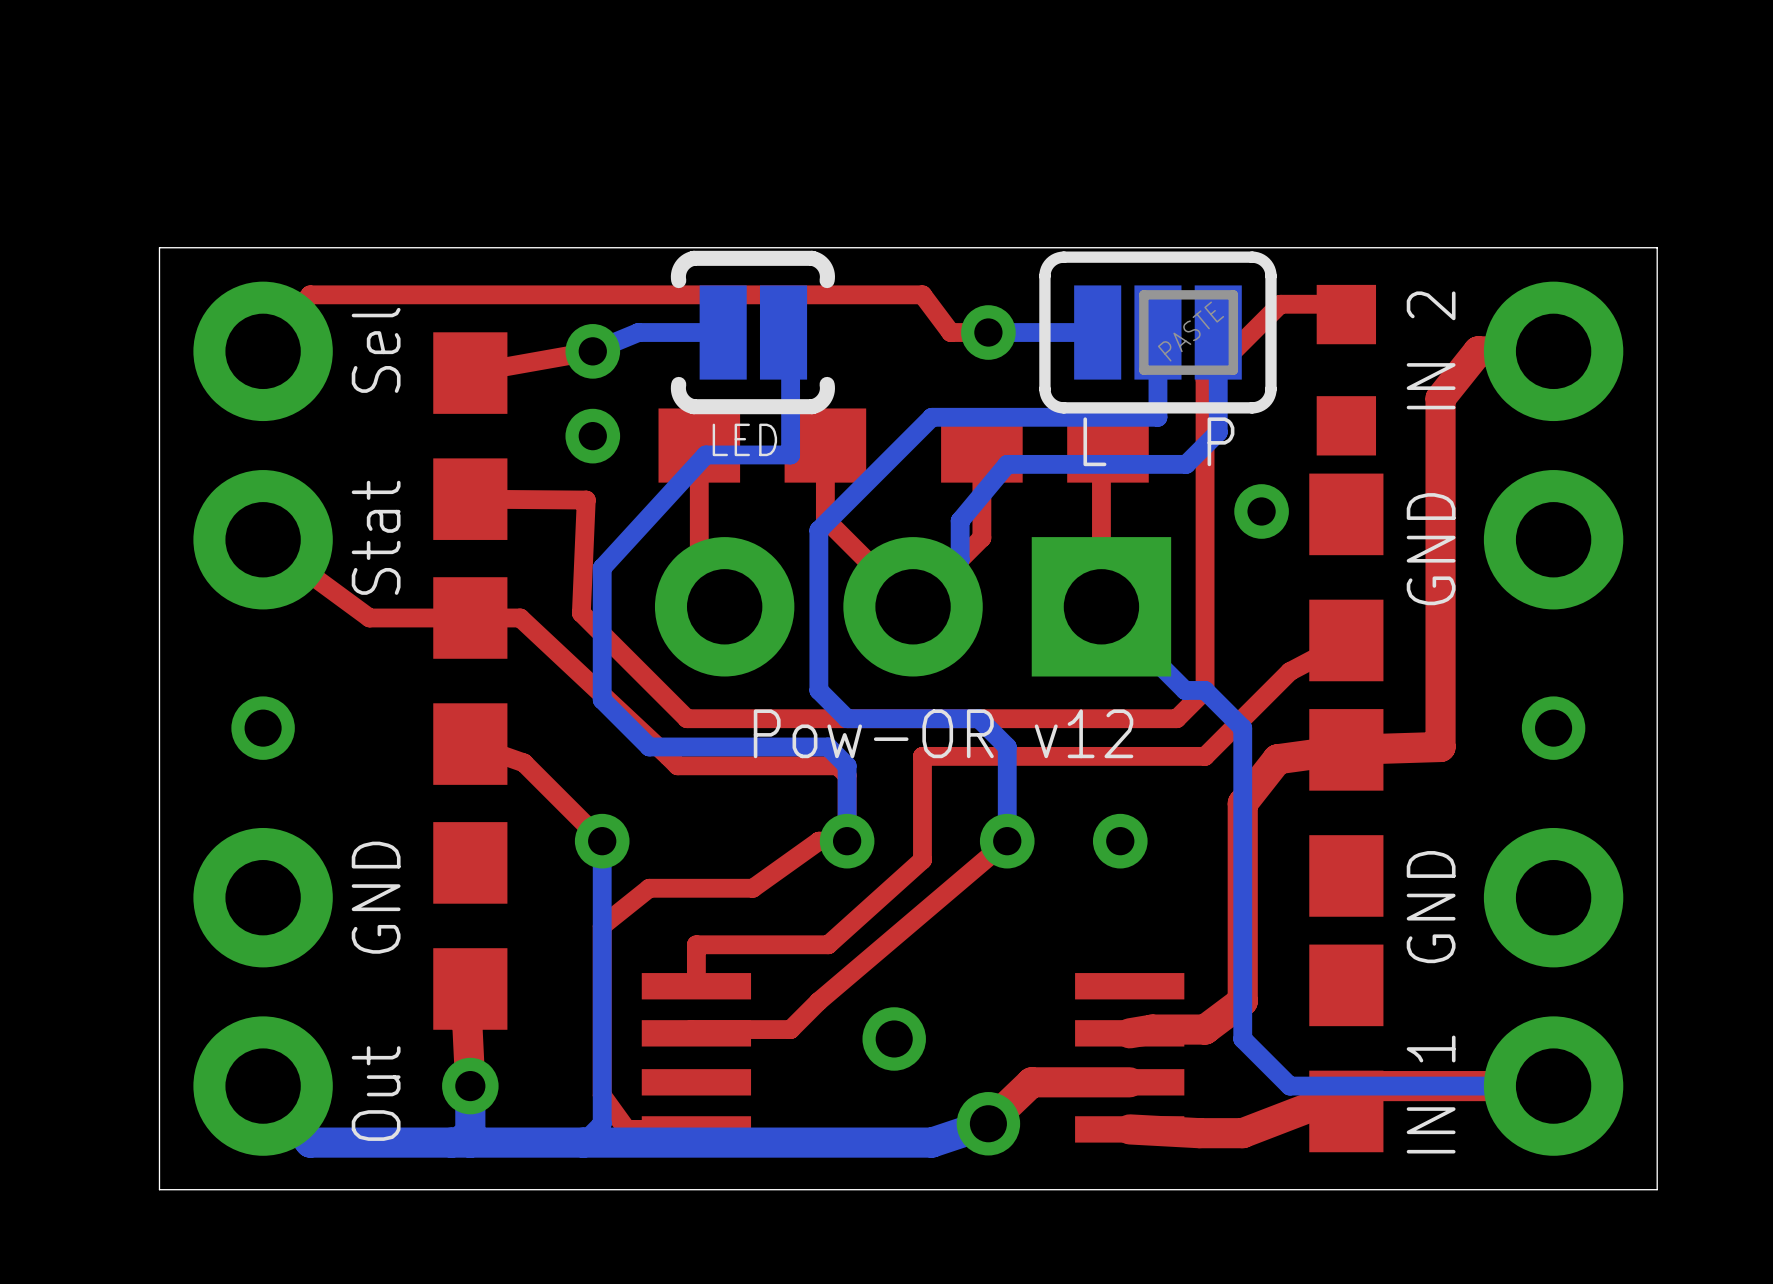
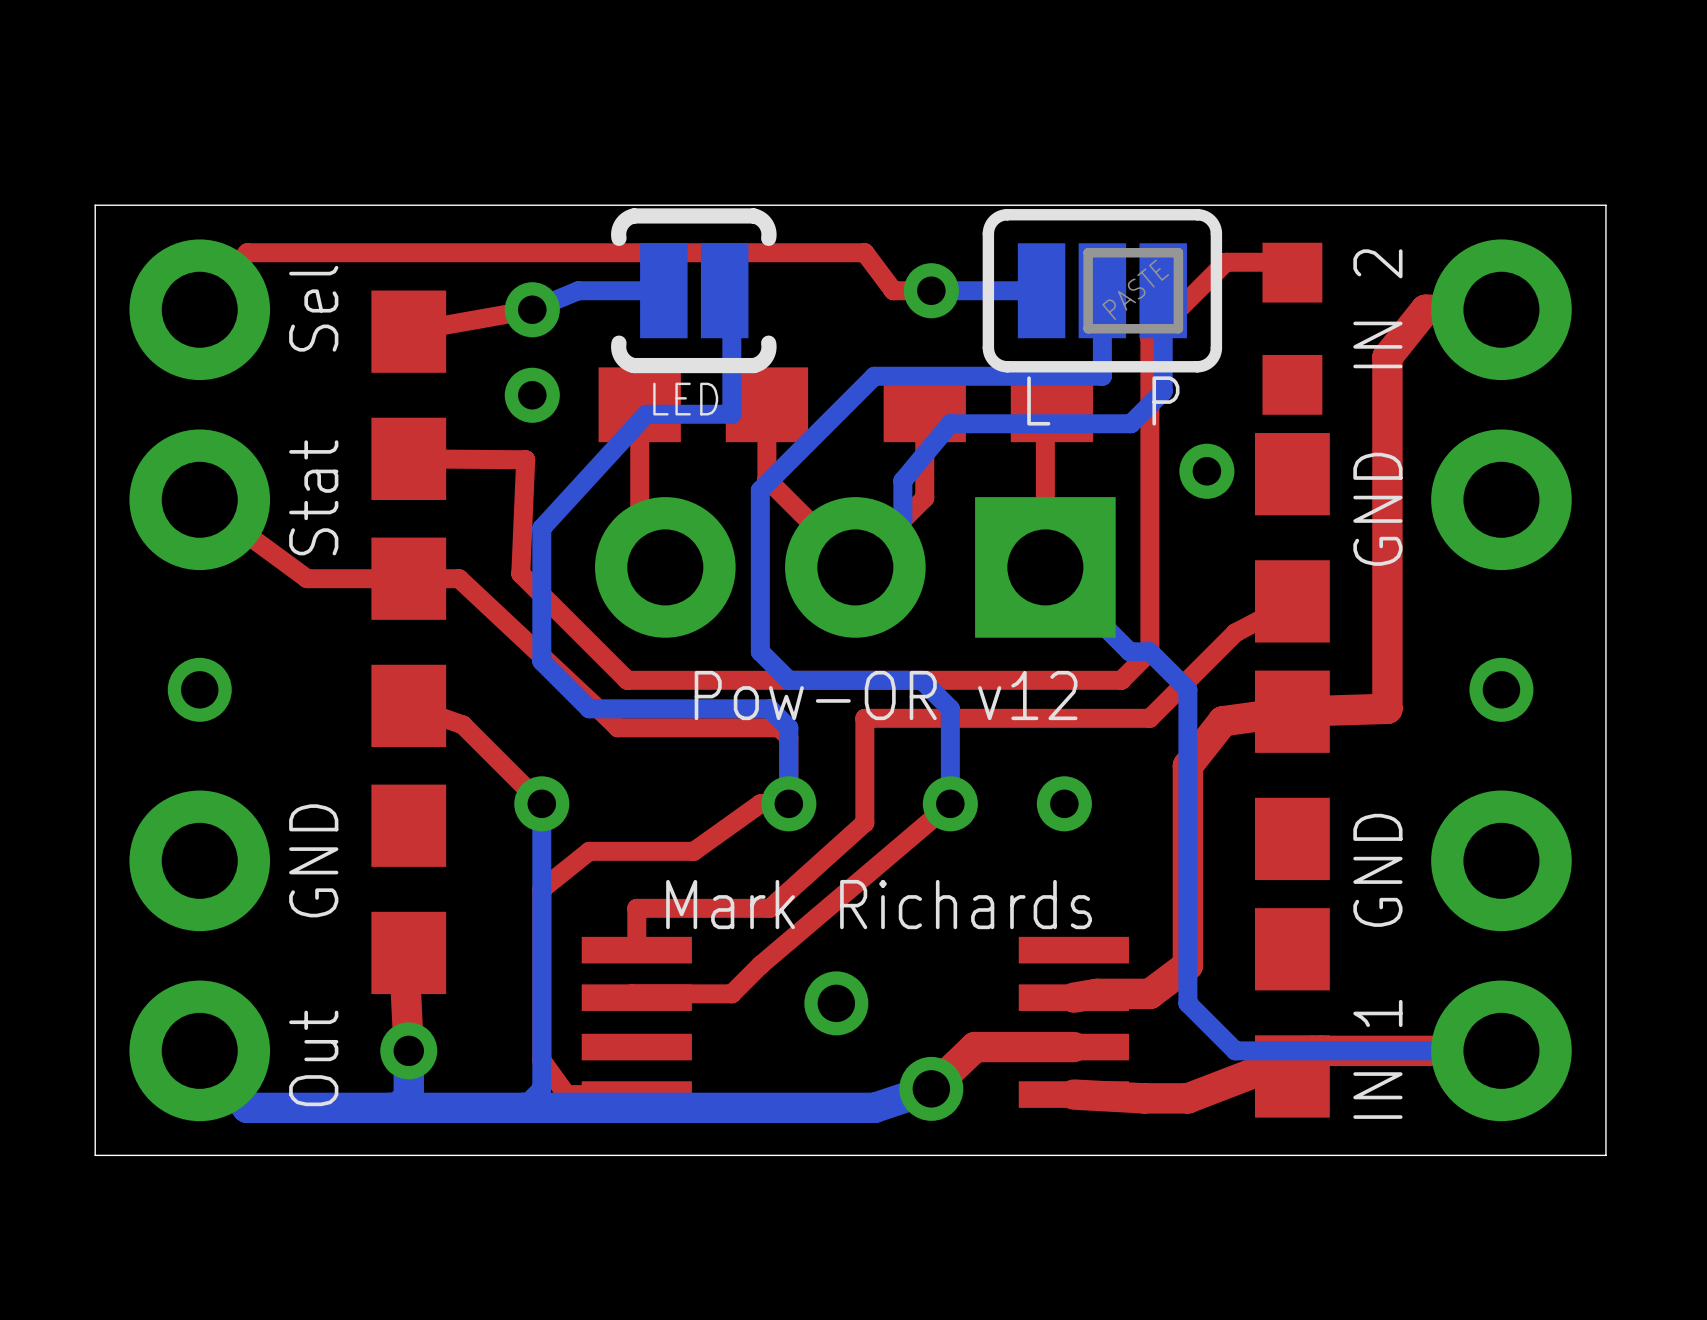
text: none -> Mark Richards (879, 904)

